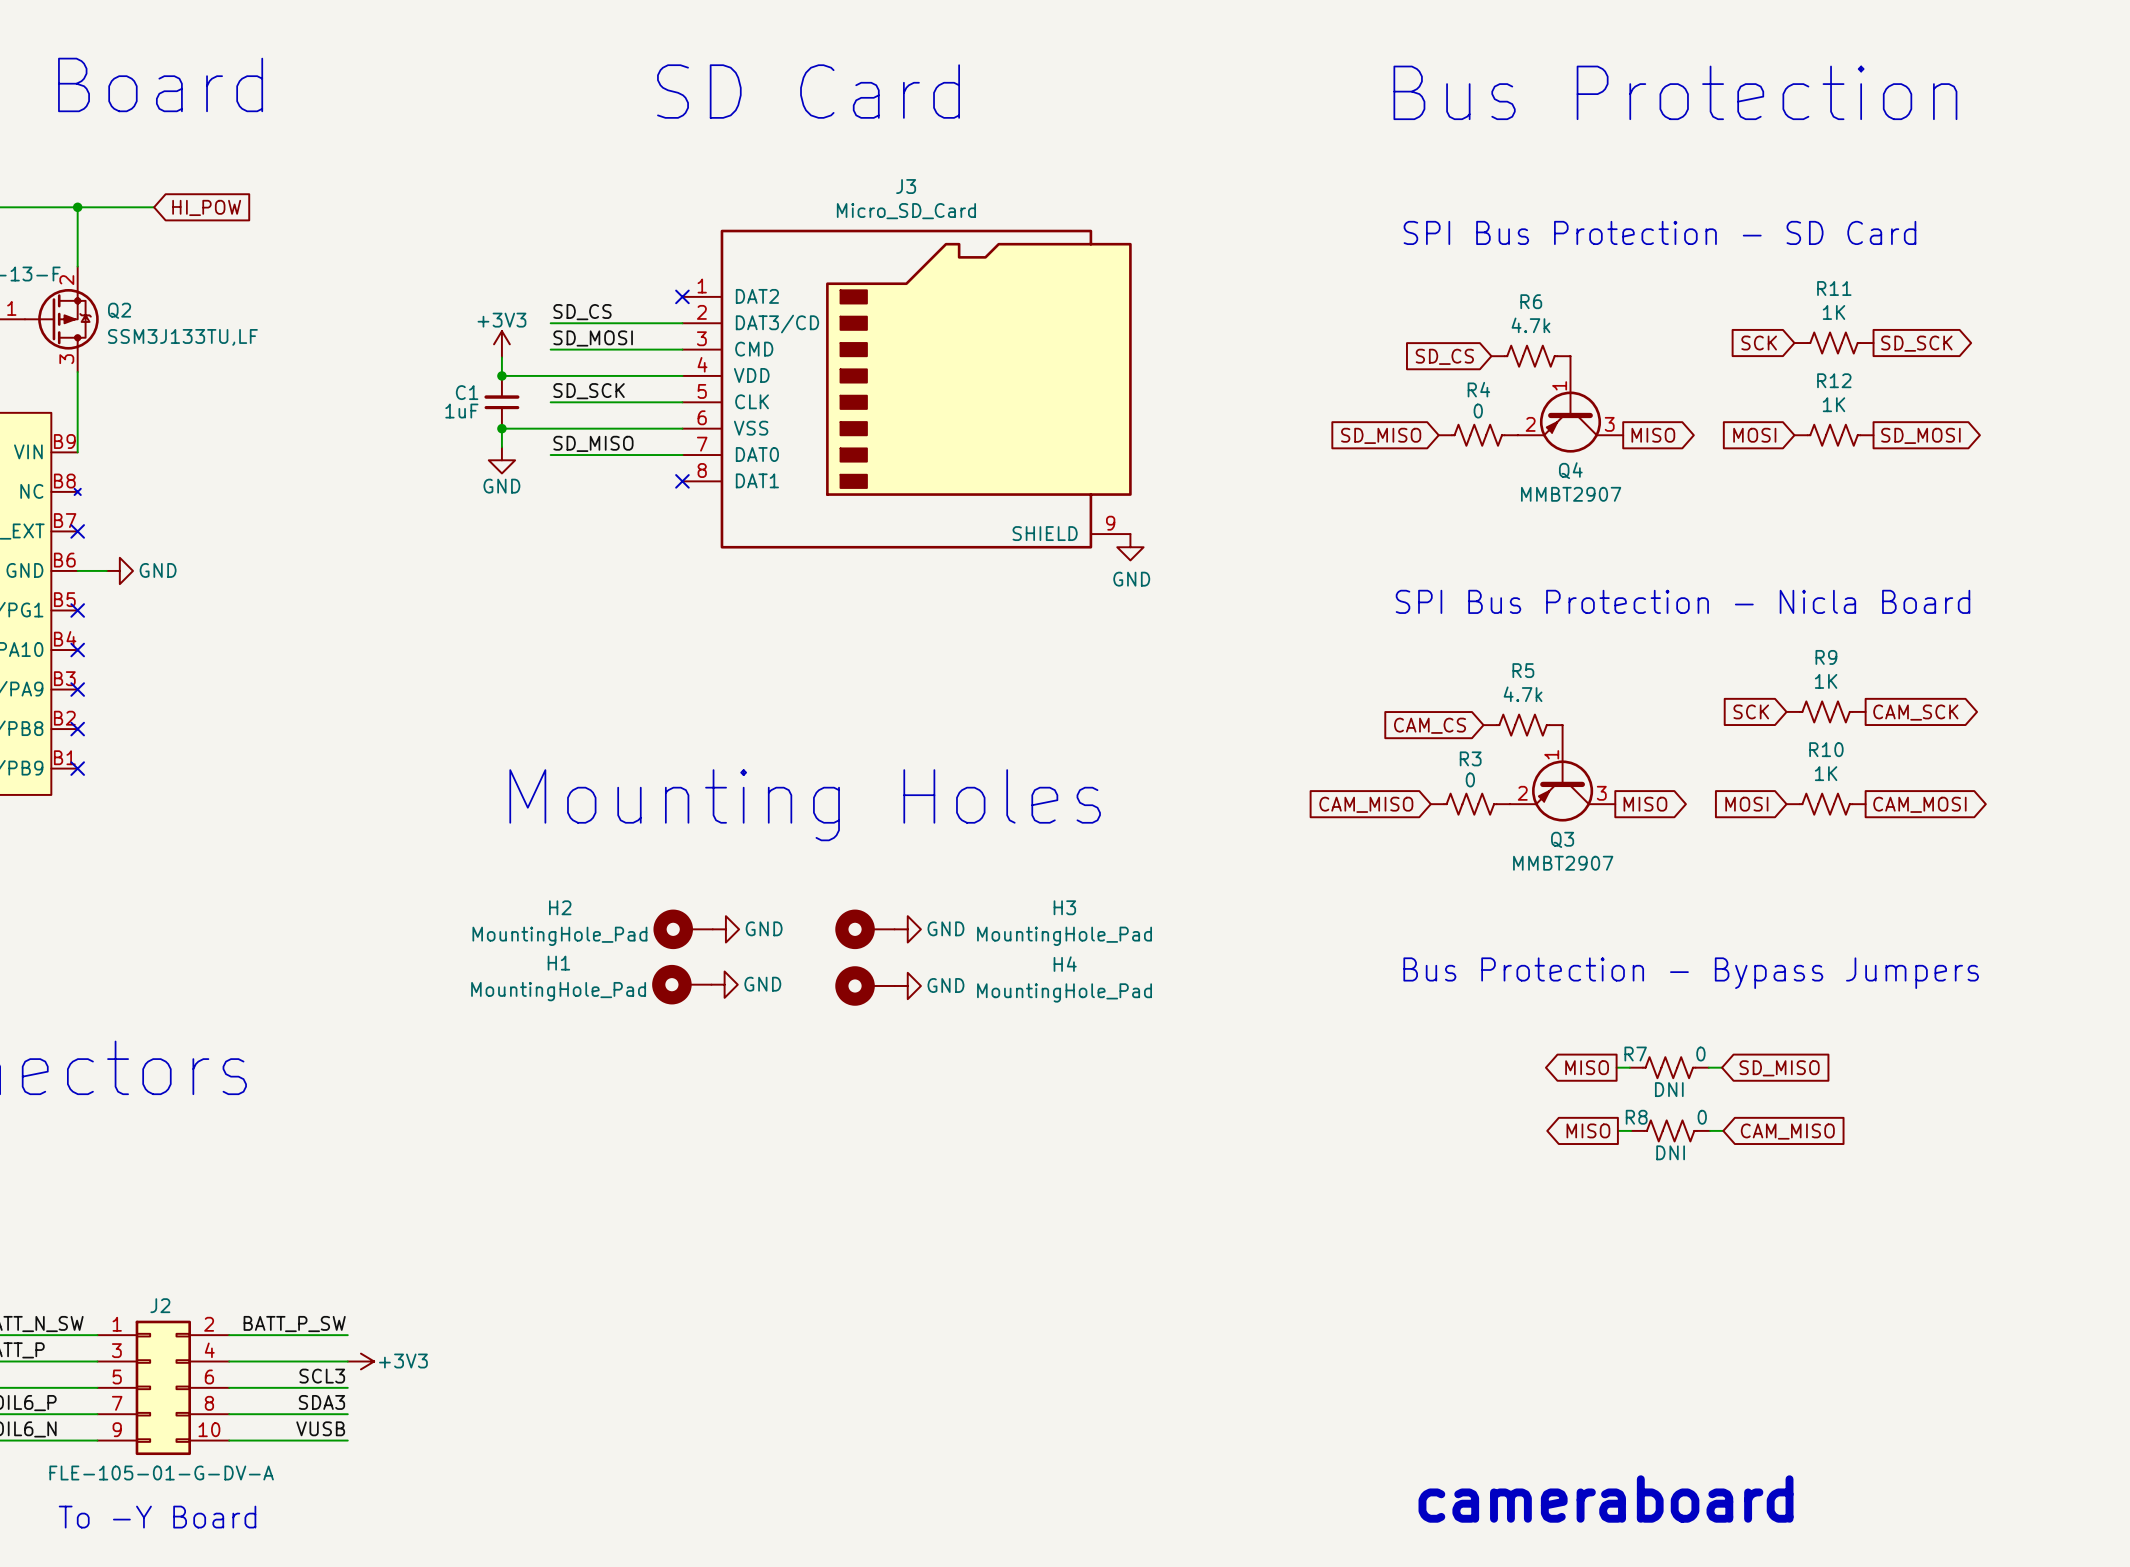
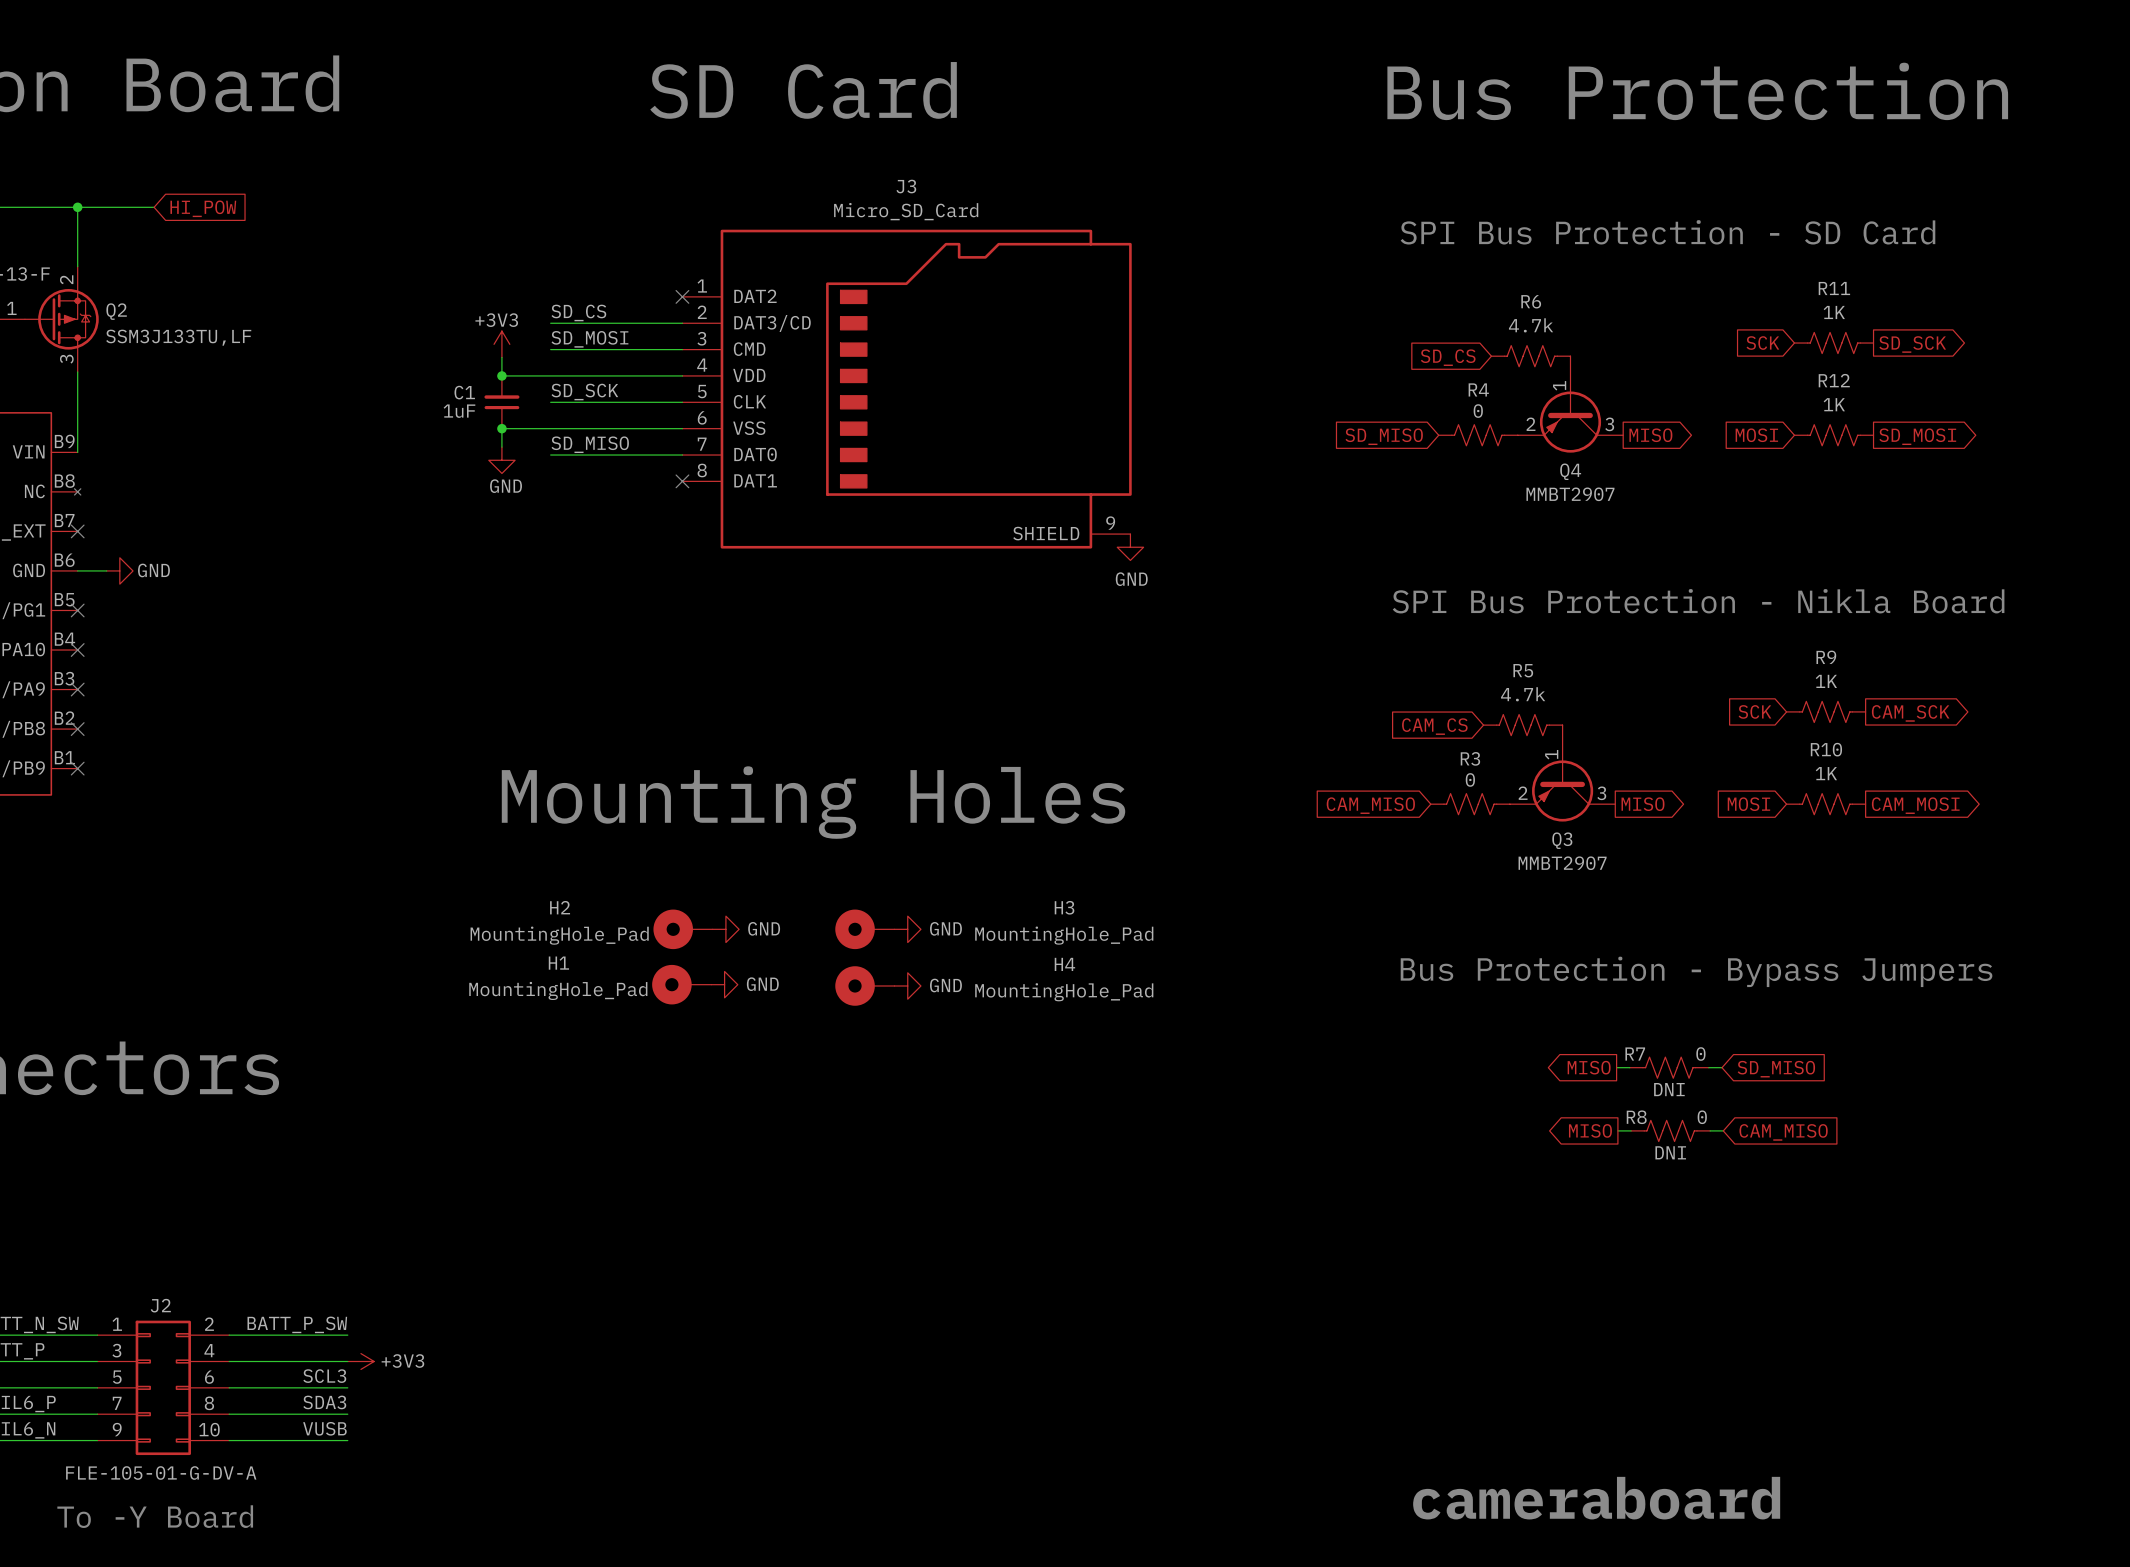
text: SPI Bus Protection - Nicla Board (1682, 601) -> SPI Bus Protection - Nikla Board (1698, 601)

